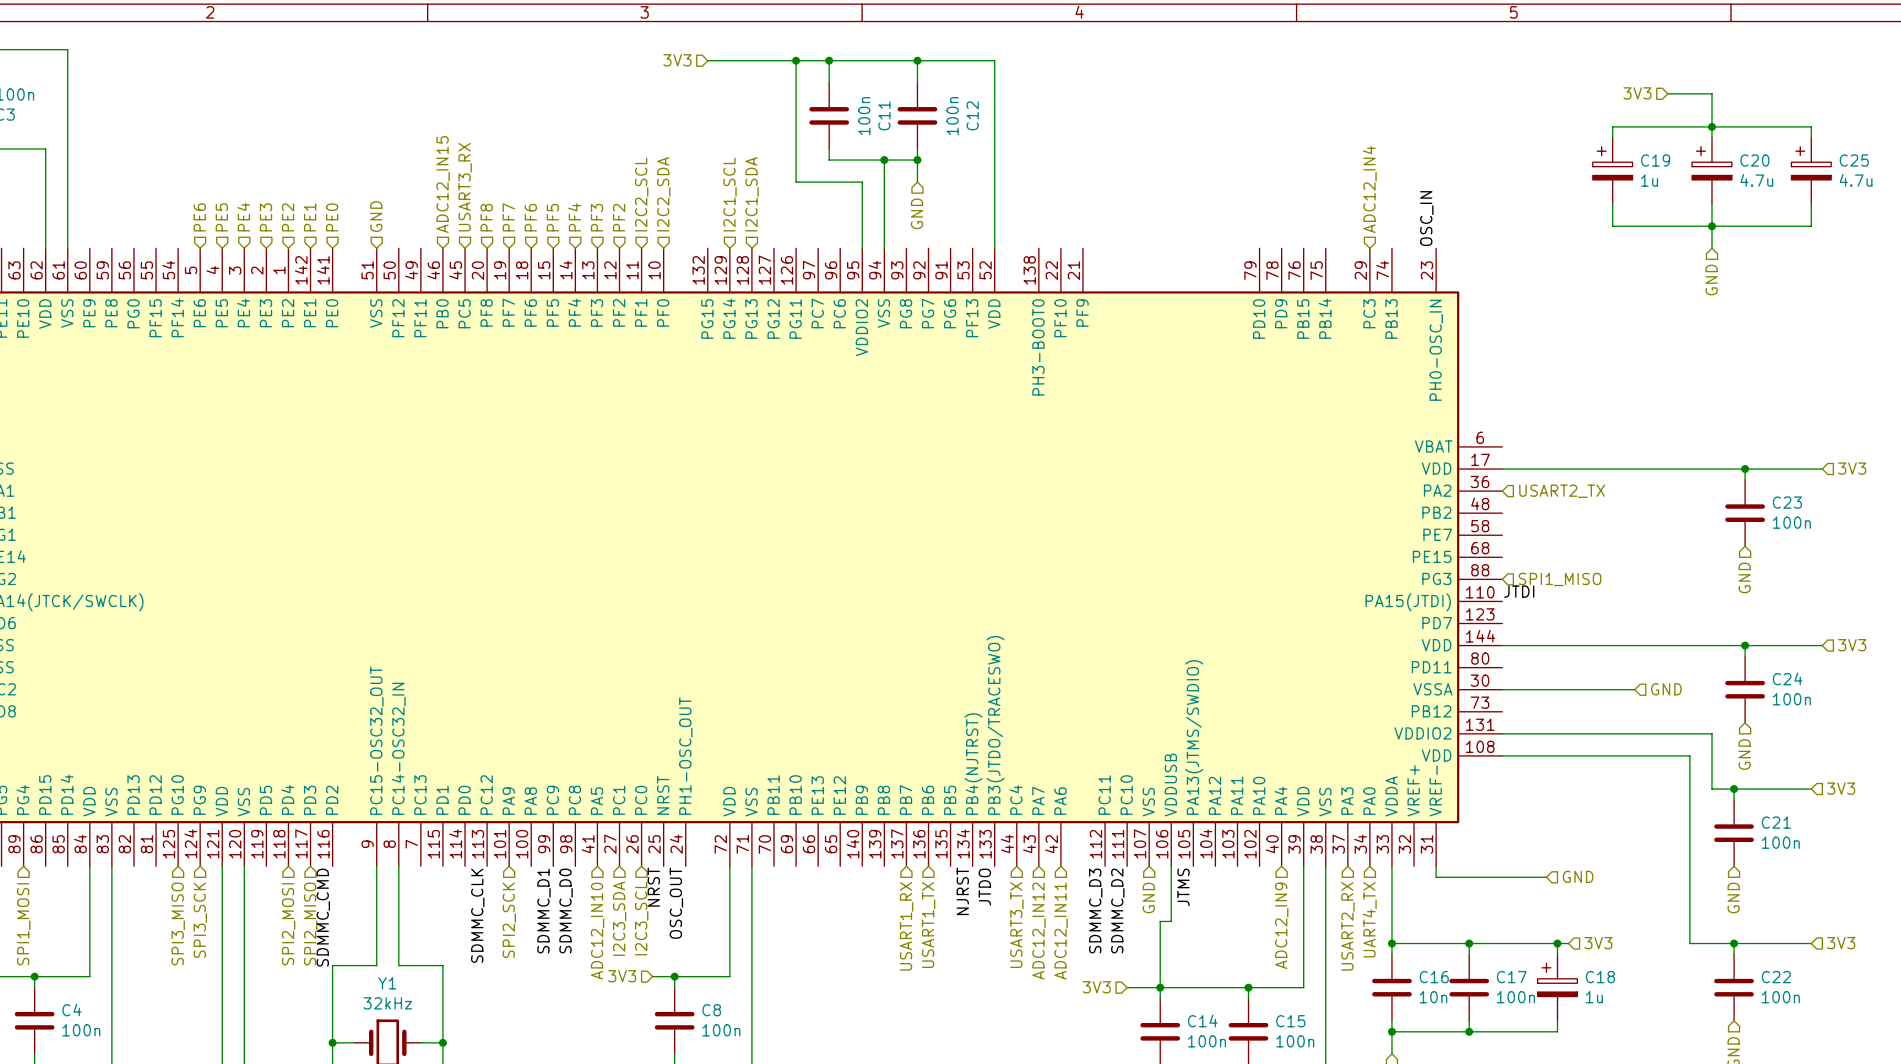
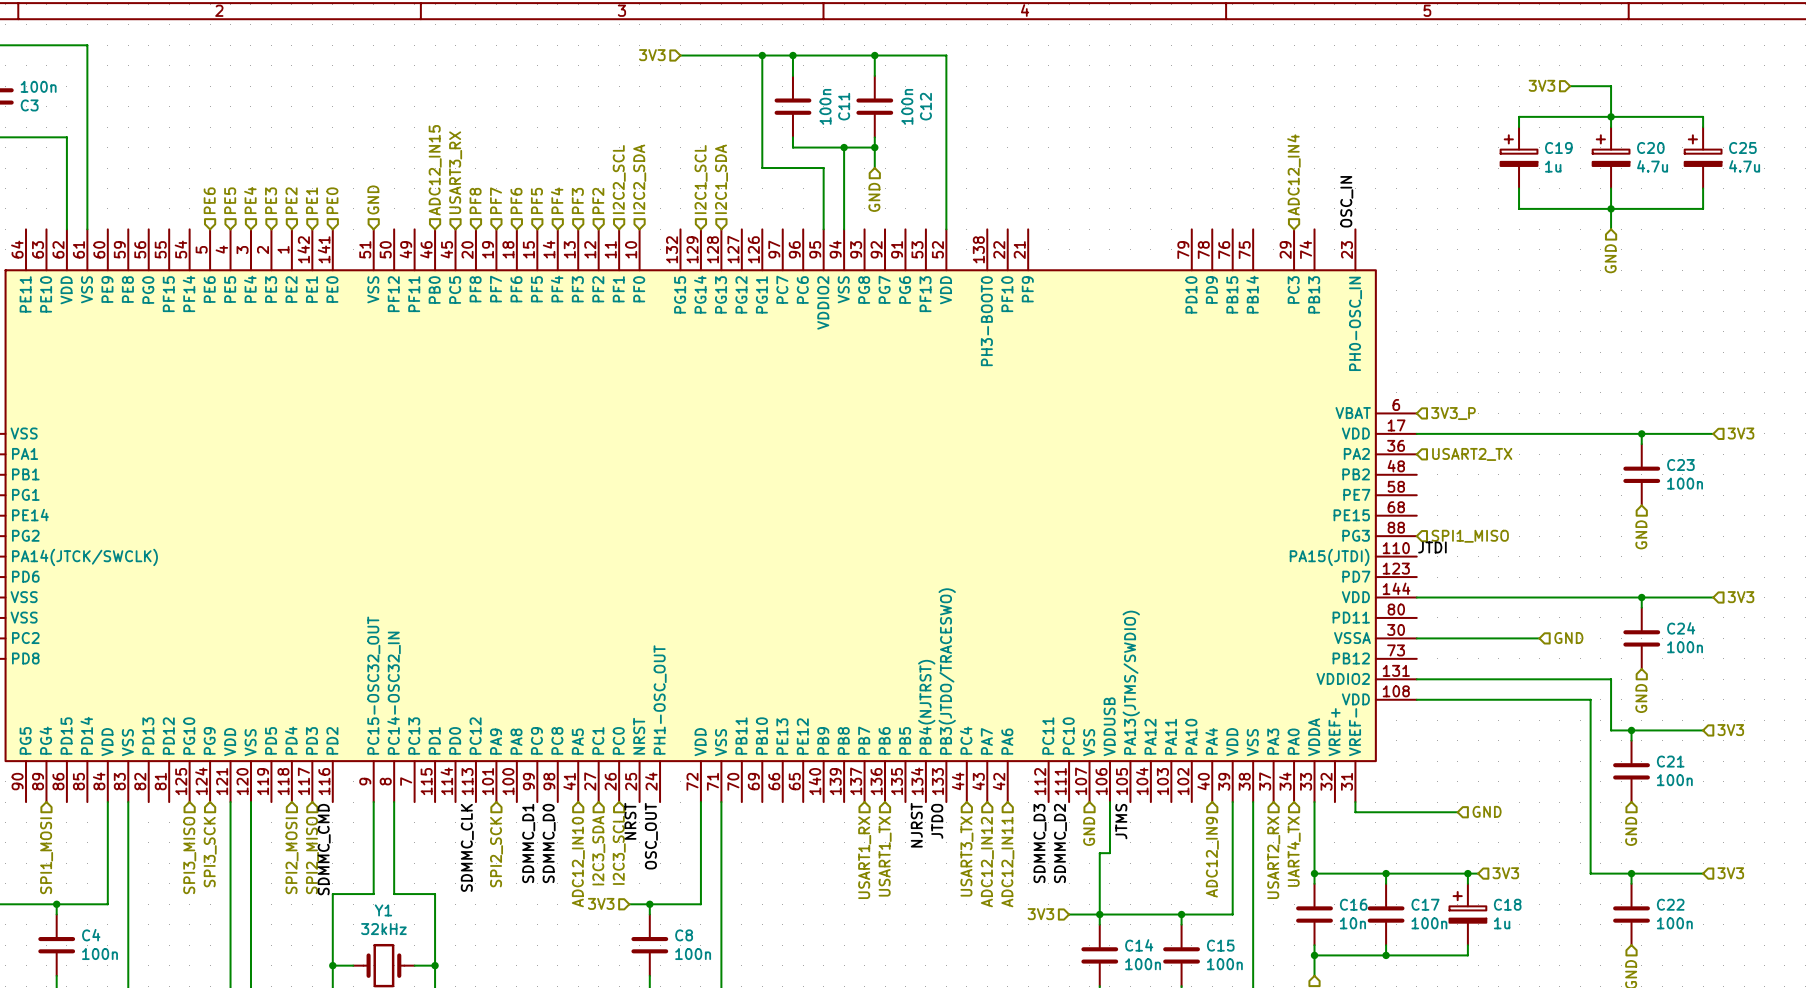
hierarchical label: none -> 3V3_P (1453, 413)

